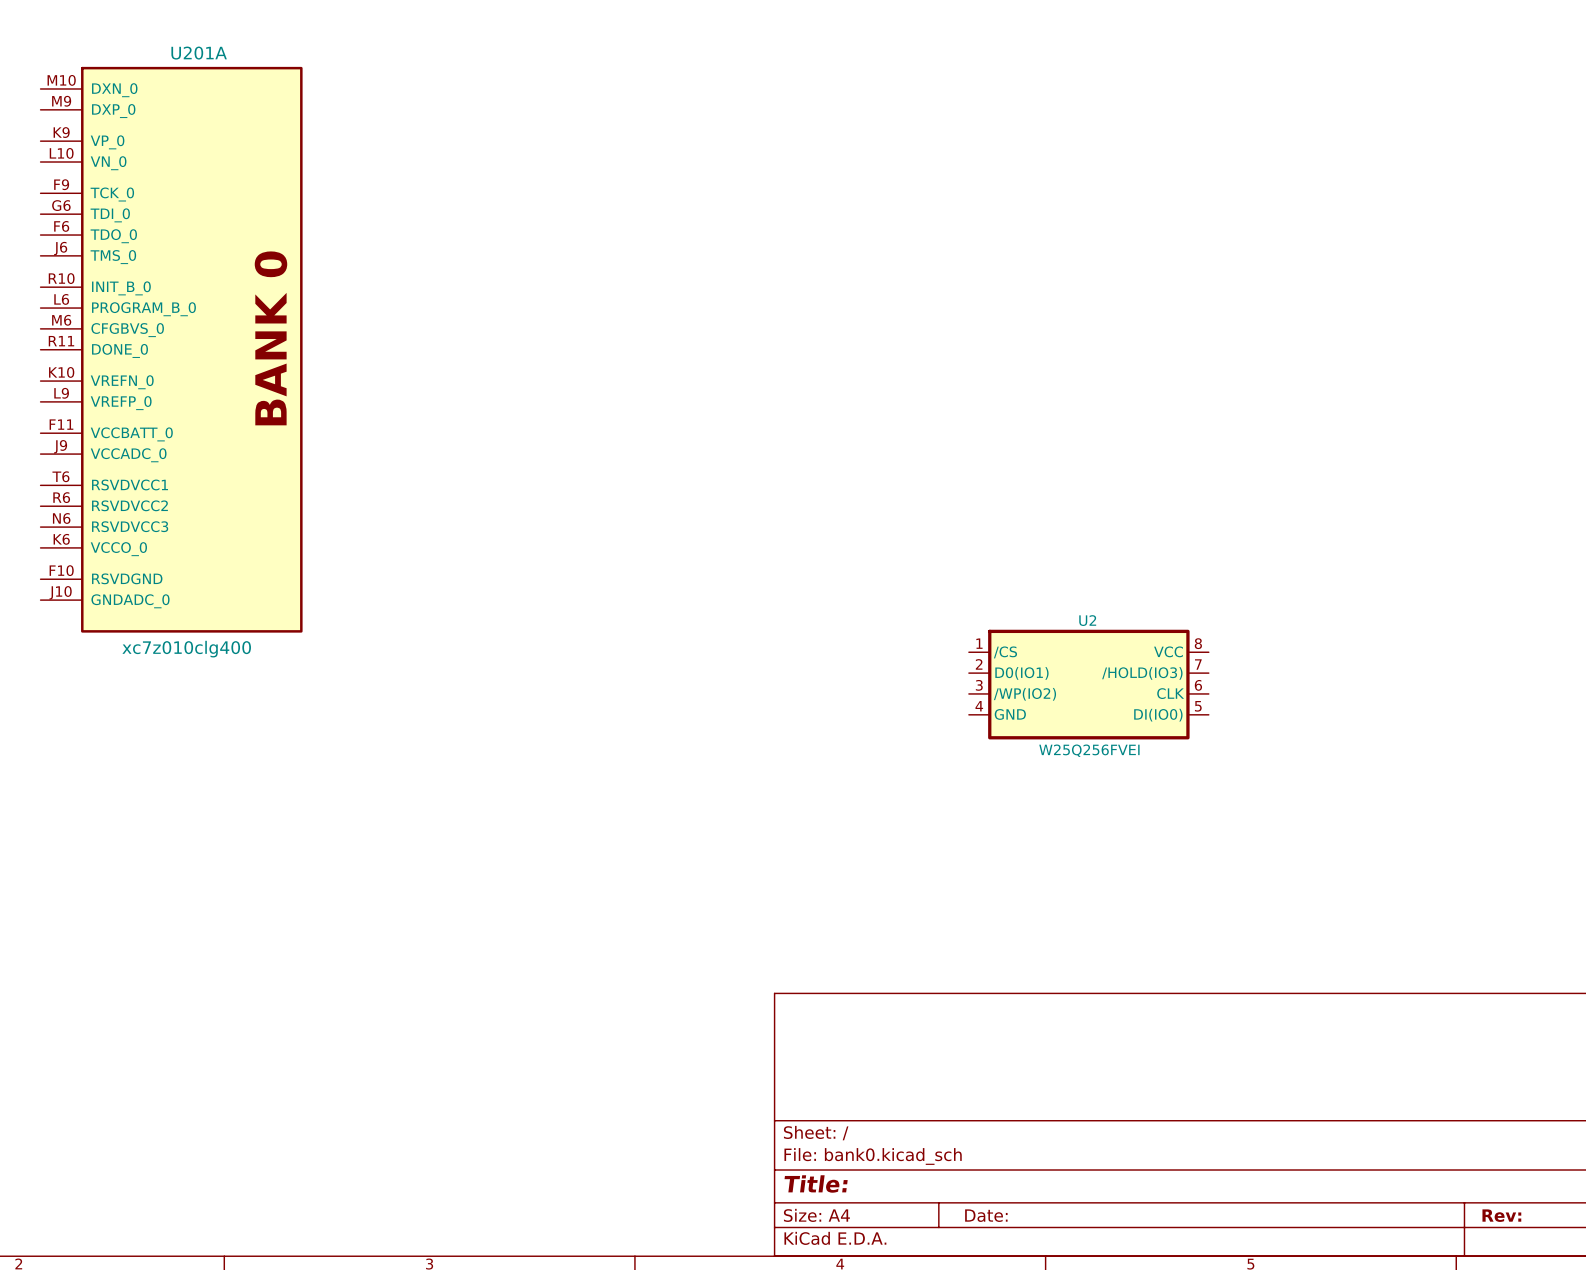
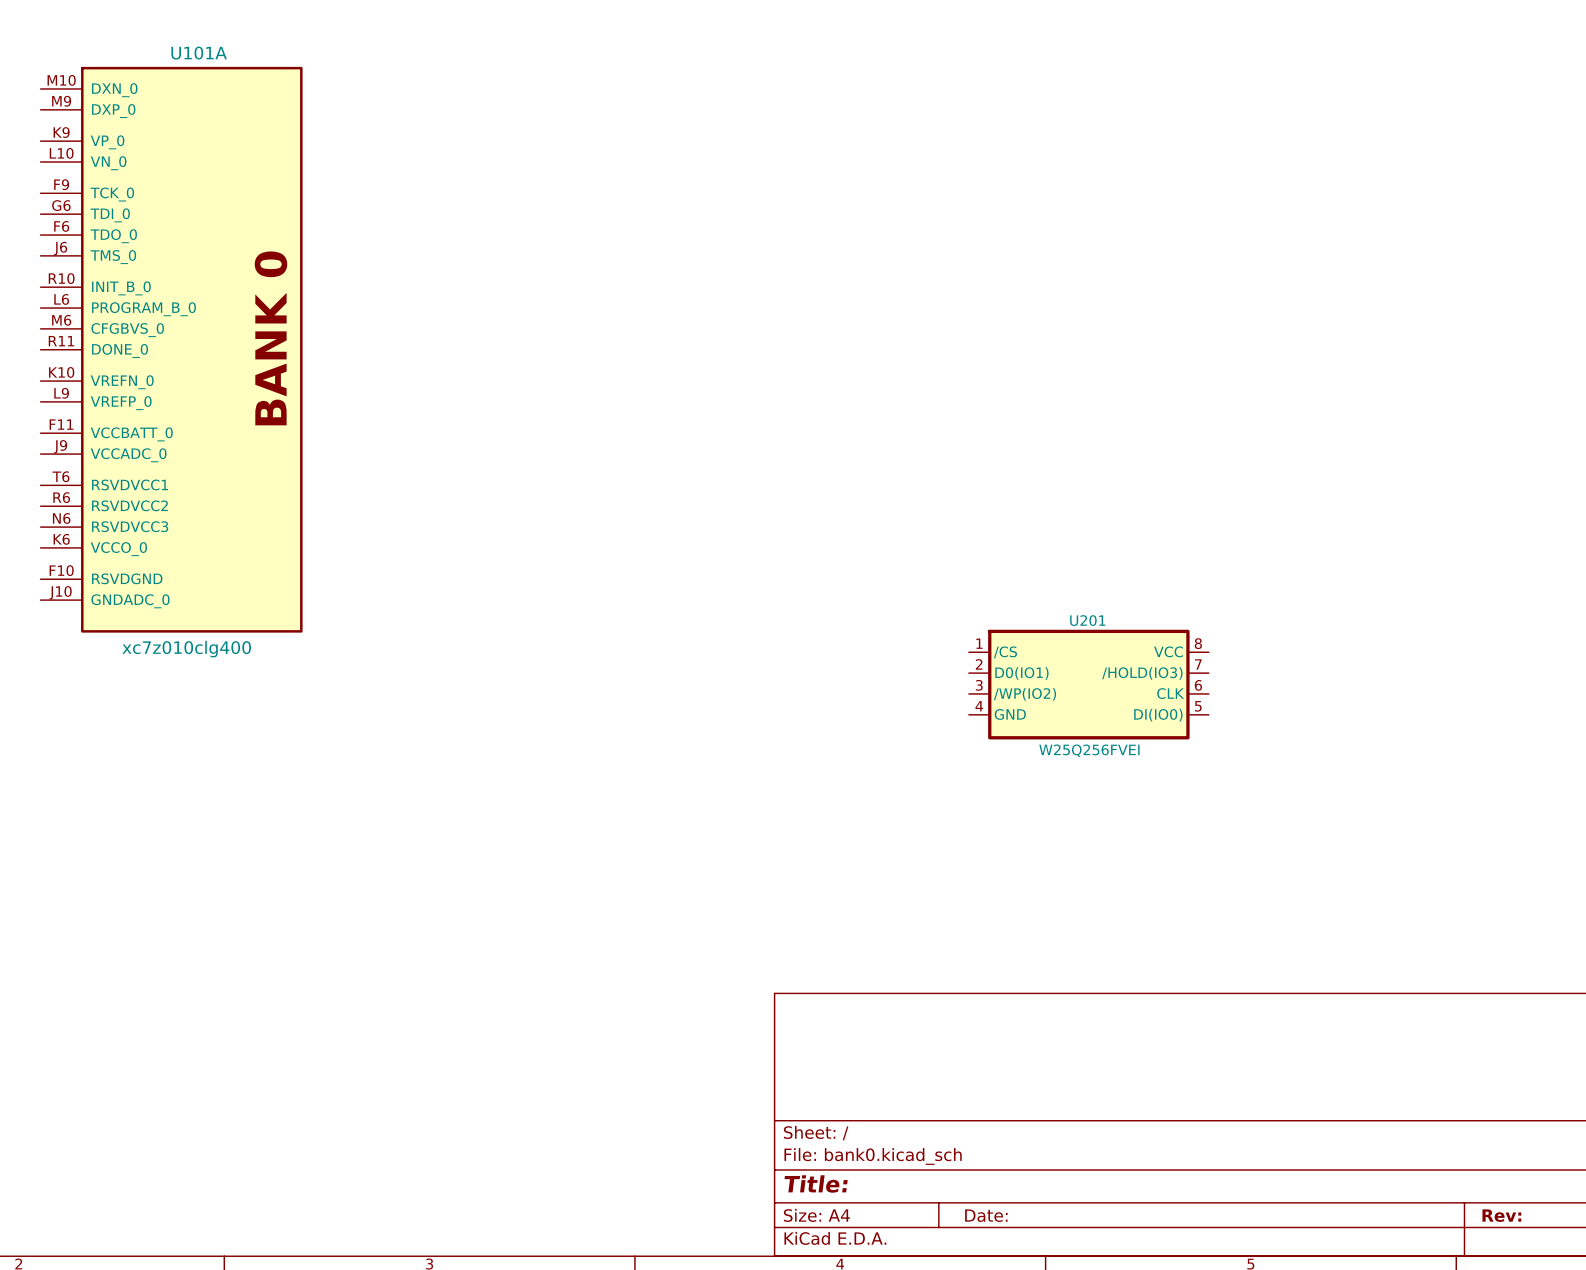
U201A name: U201A (199, 53) -> U101A (199, 53)
U2 name: U2 (1087, 620) -> U201 (1087, 620)

